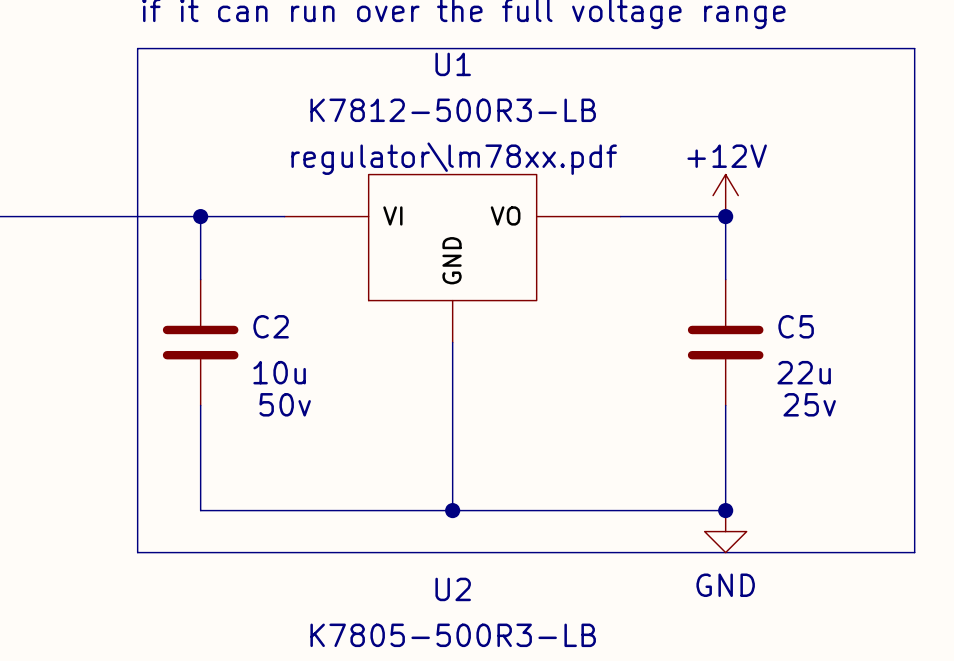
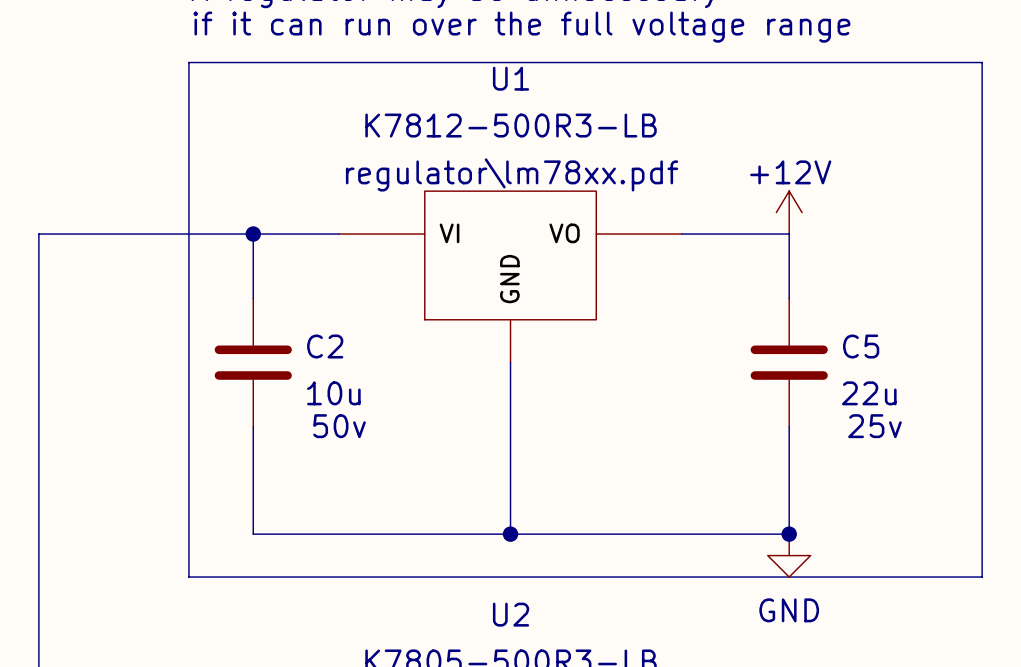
junction: (725, 216) -> none

